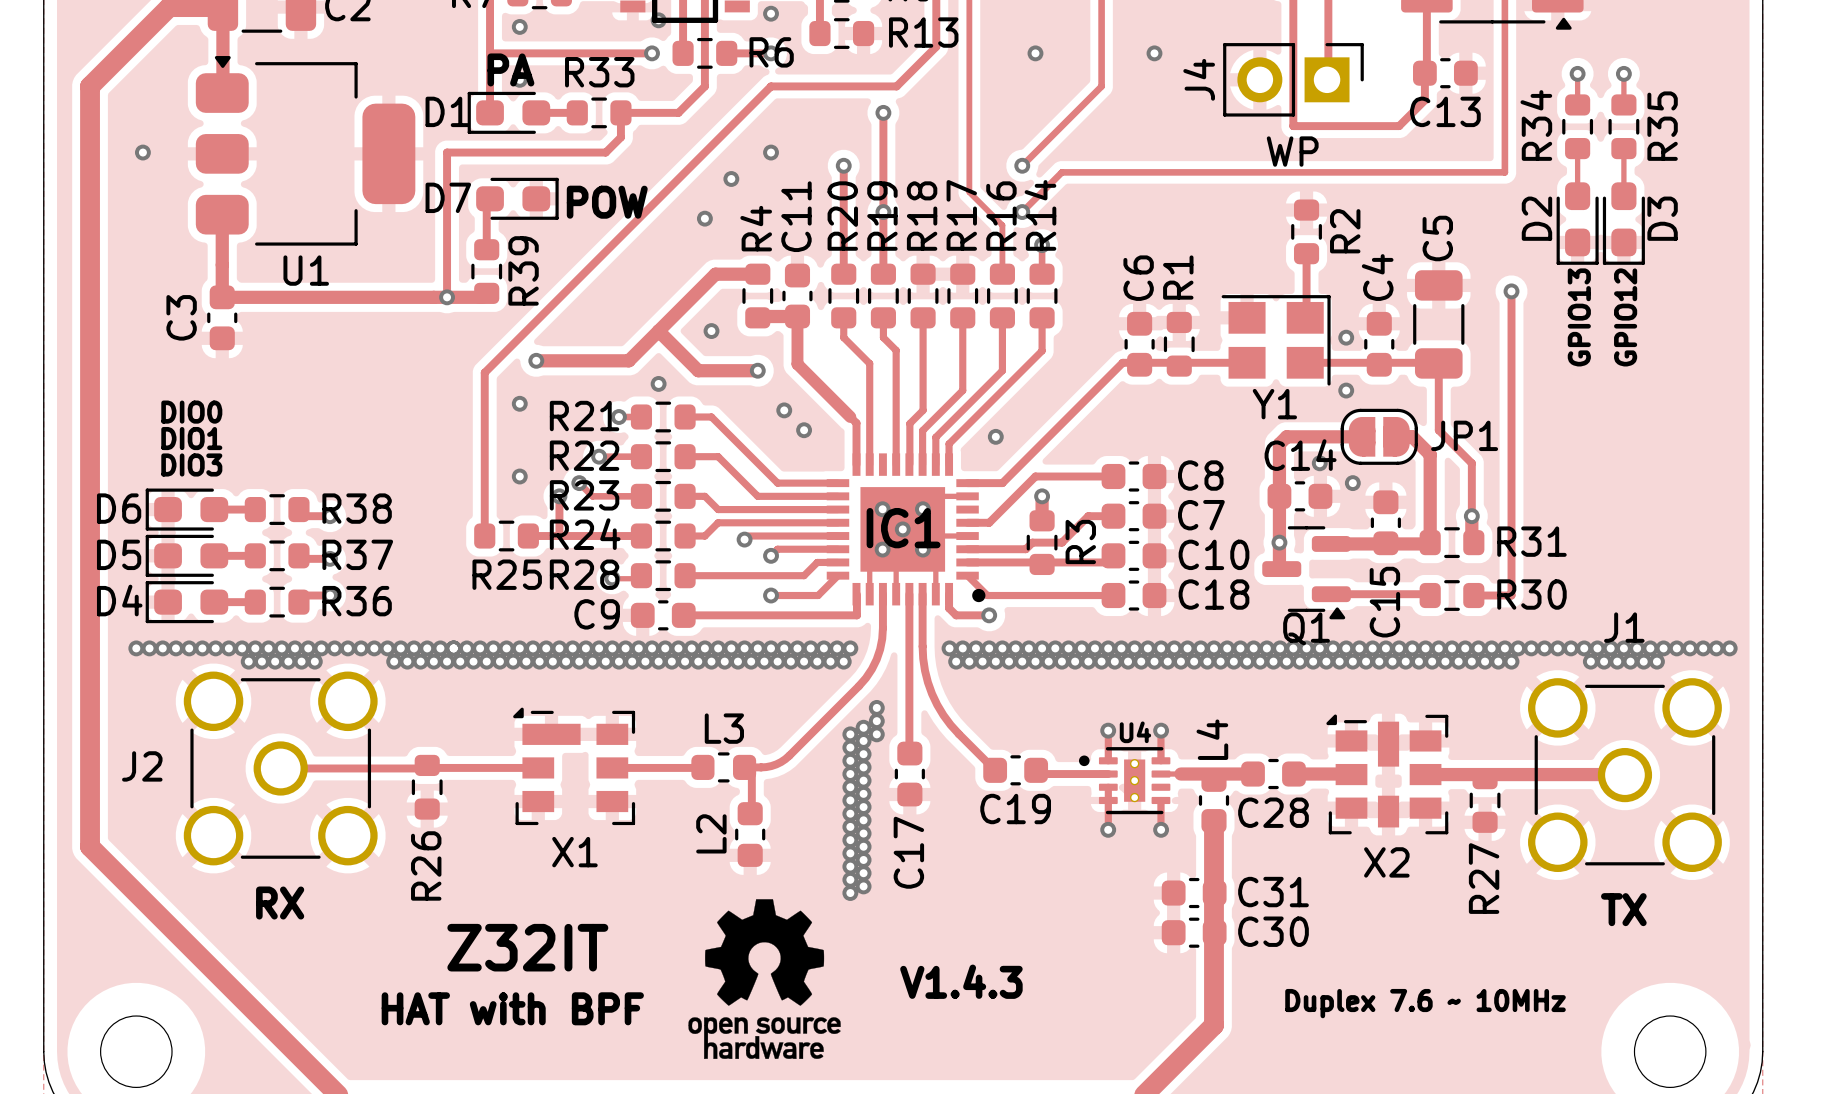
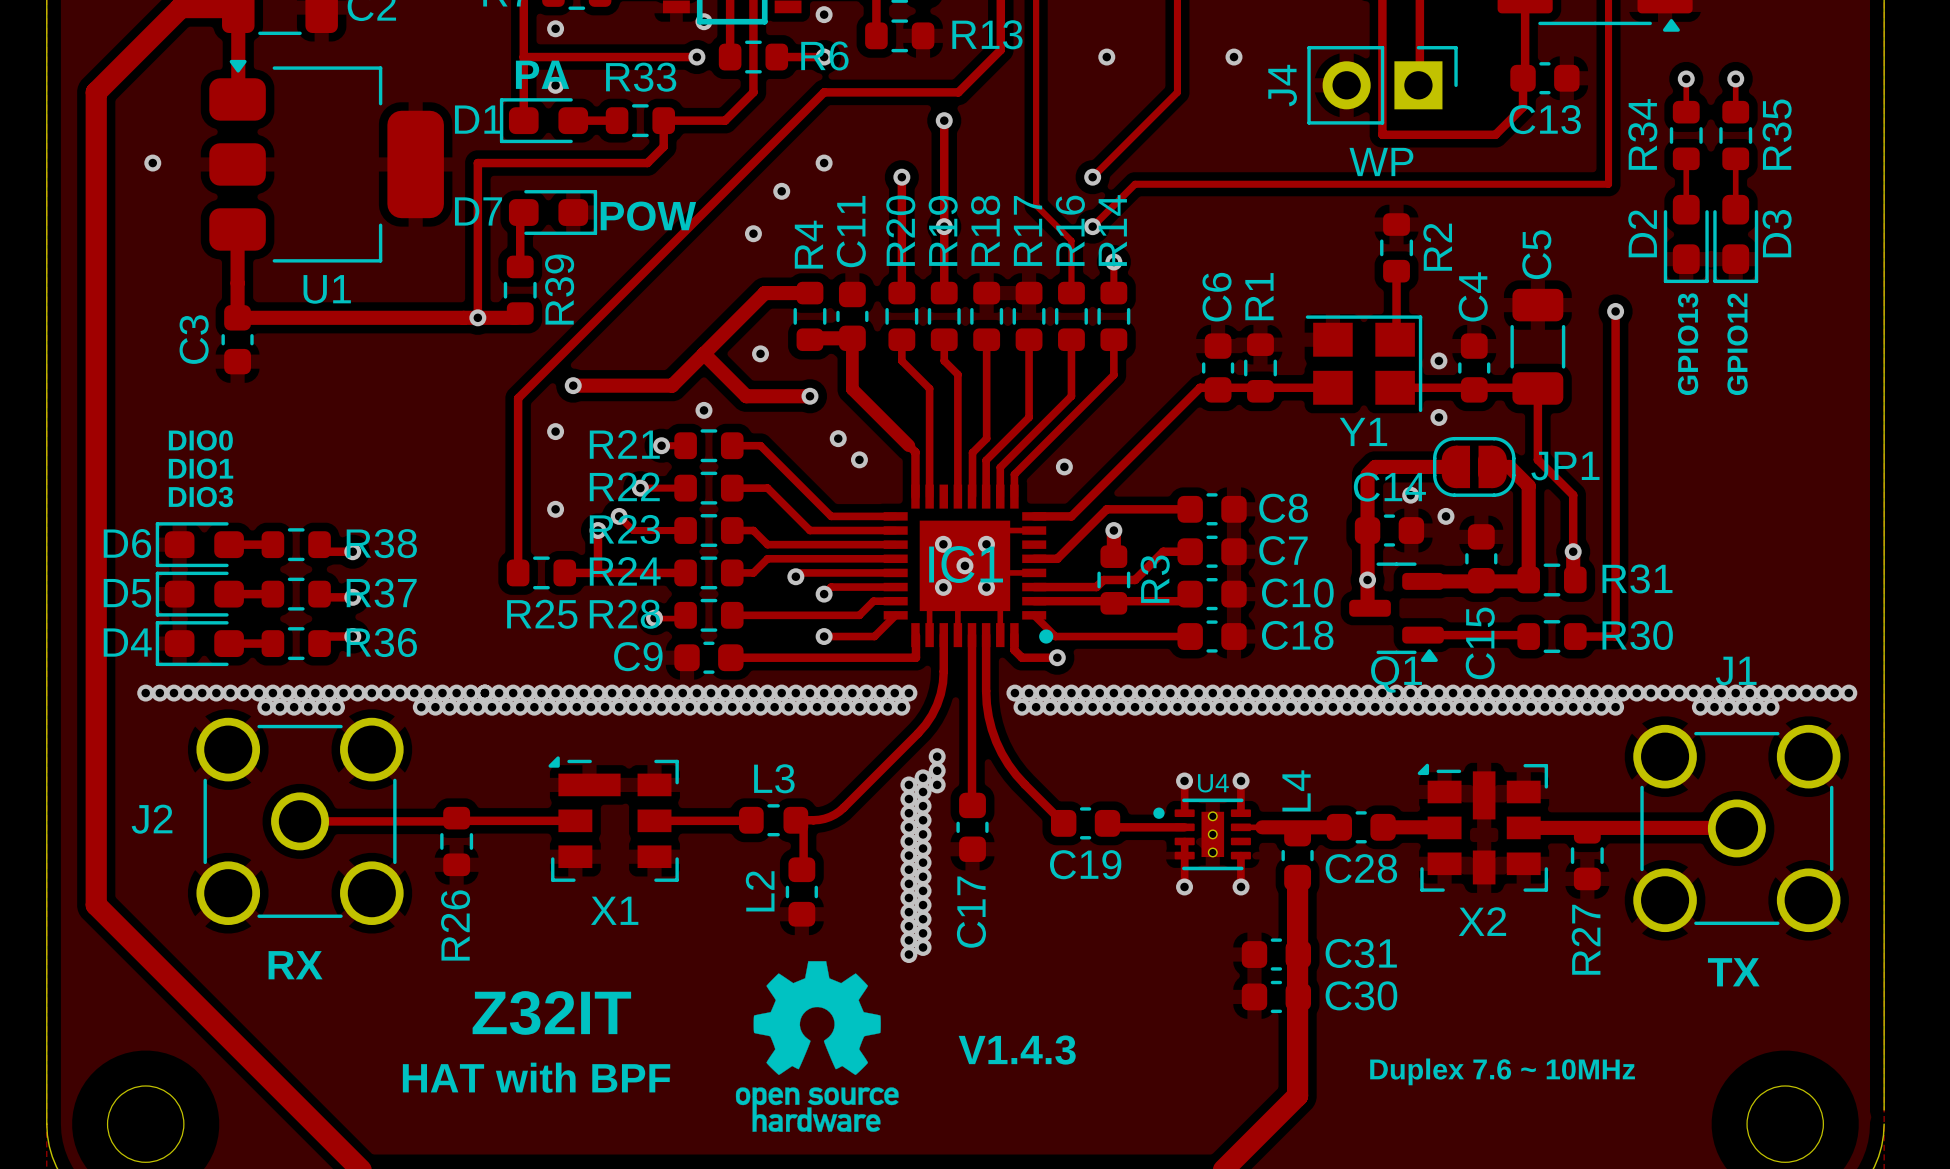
board edge: (1762, 1038) (1762, 1051) -> none

